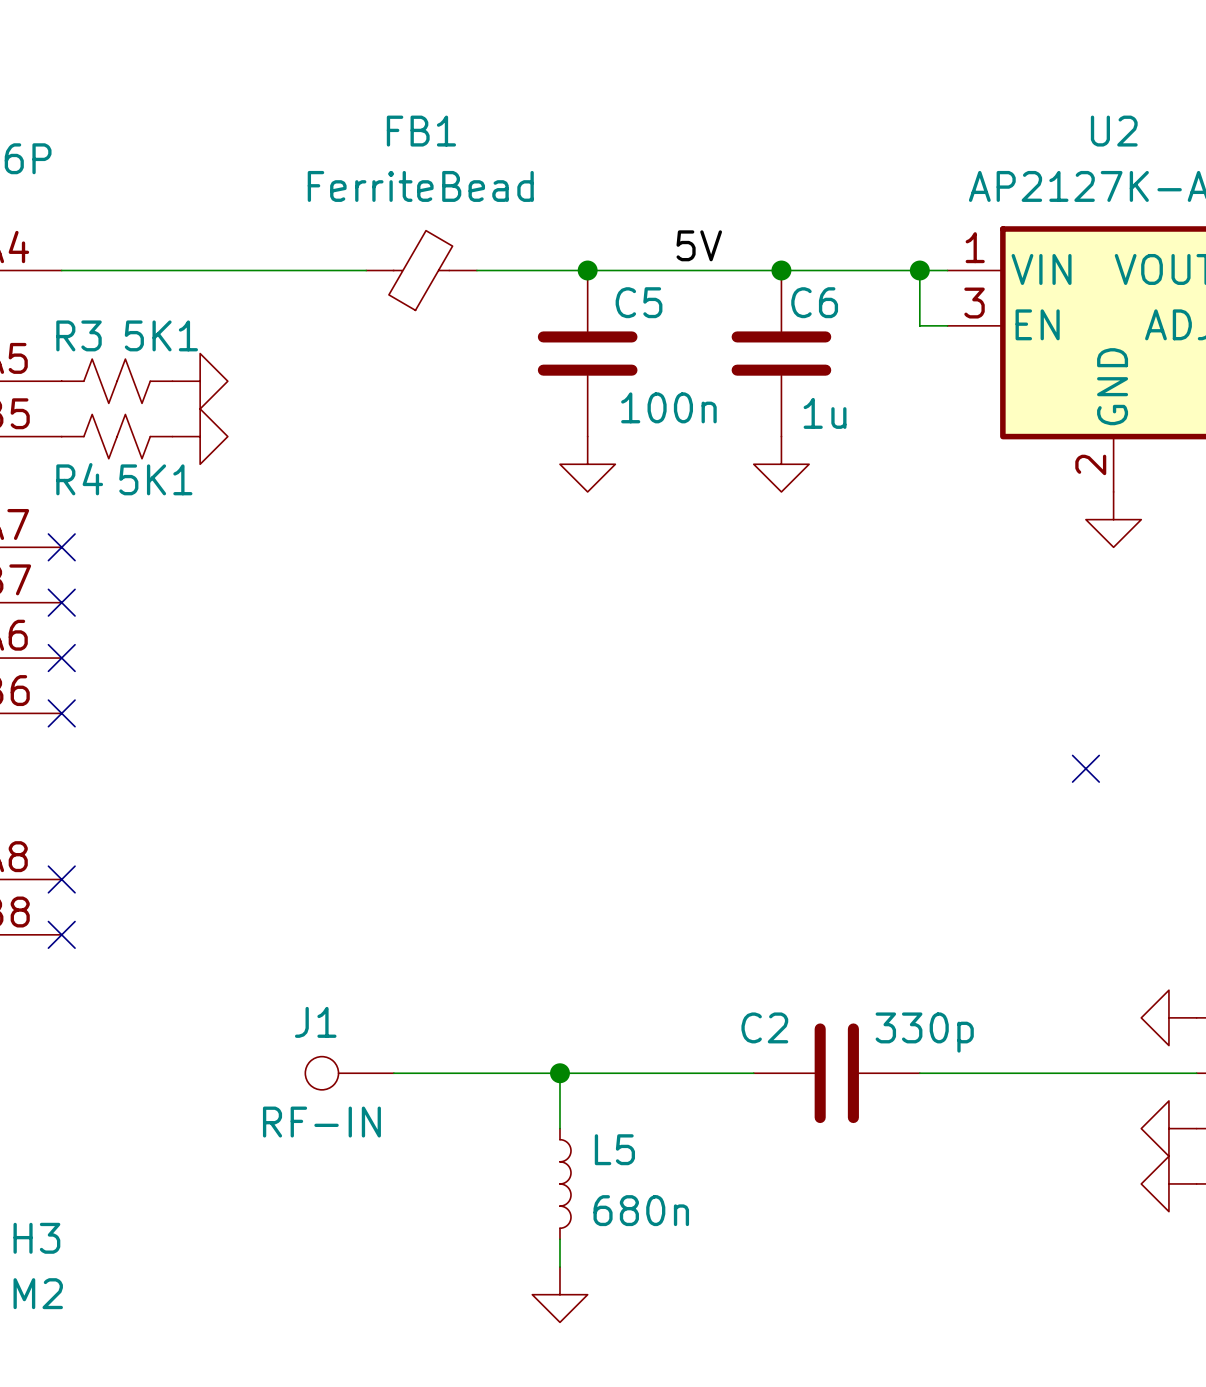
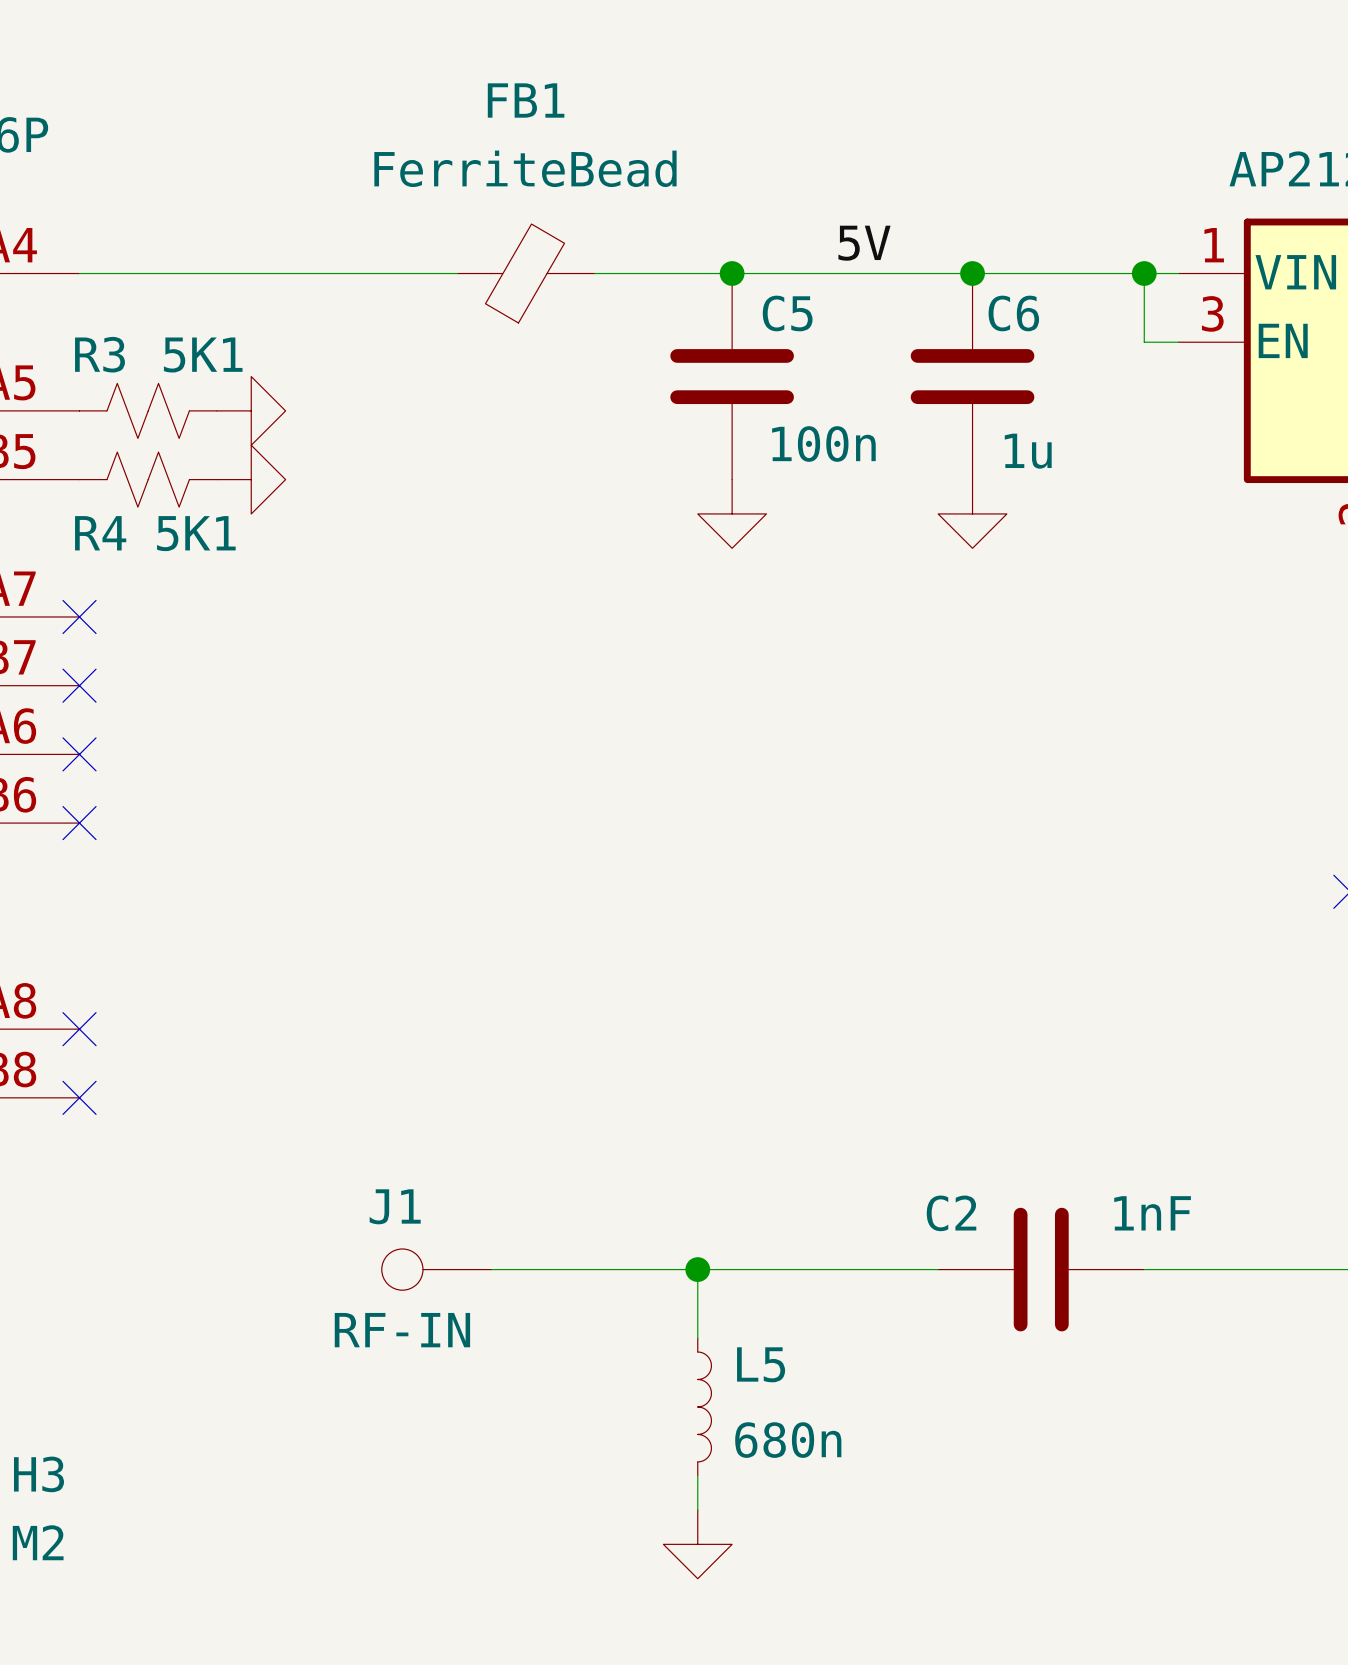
C2 value: 330p (924, 1032) -> 1nF (1152, 1213)

